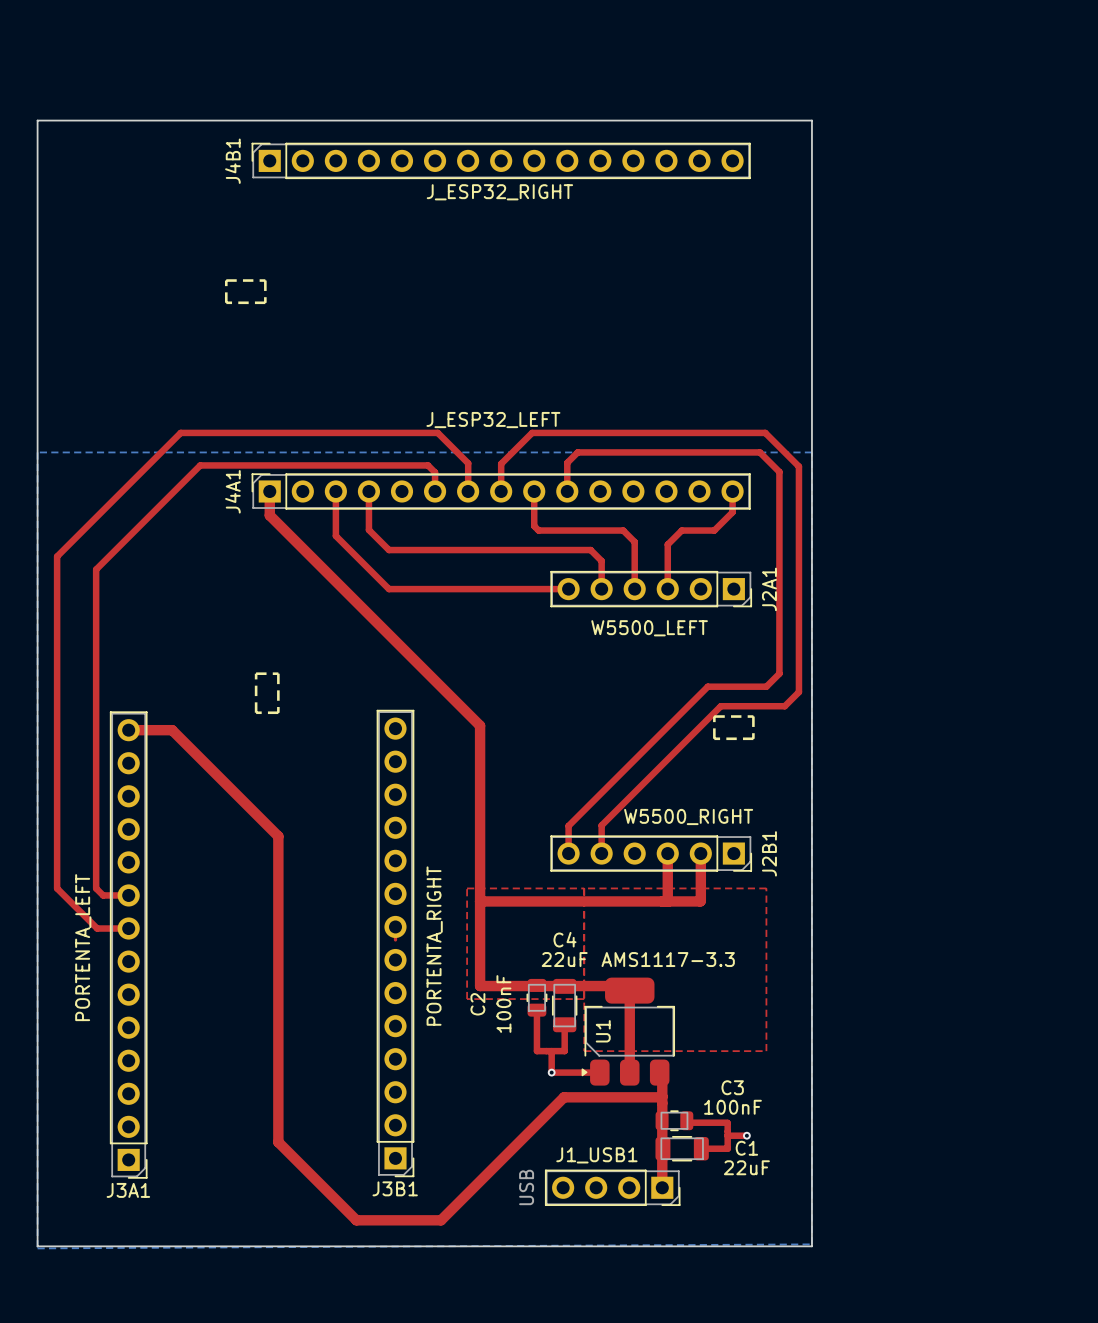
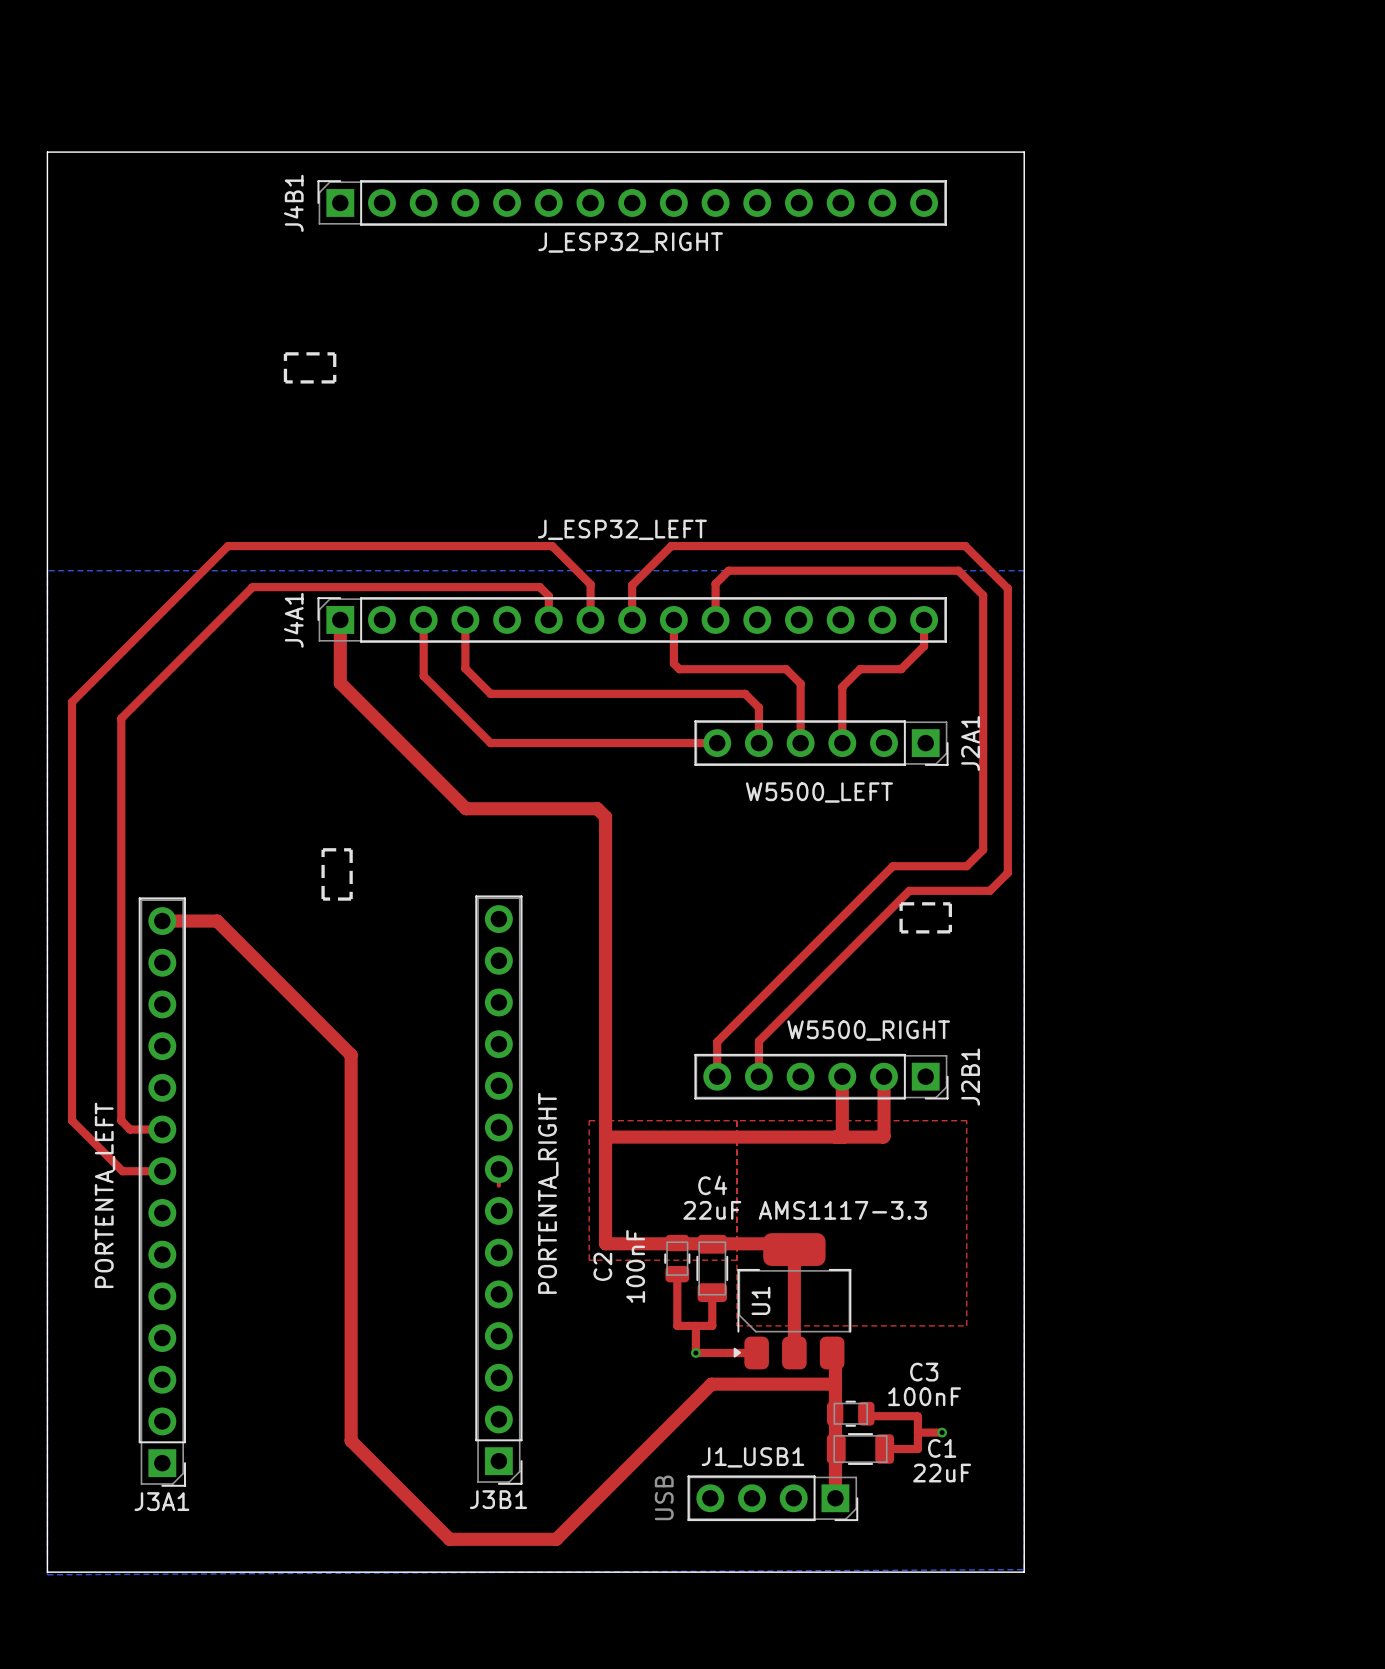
top track: (269, 515) (480, 725) -> (340, 650) (340, 683) (466, 808) (597, 808) (605, 816) (605, 915)

